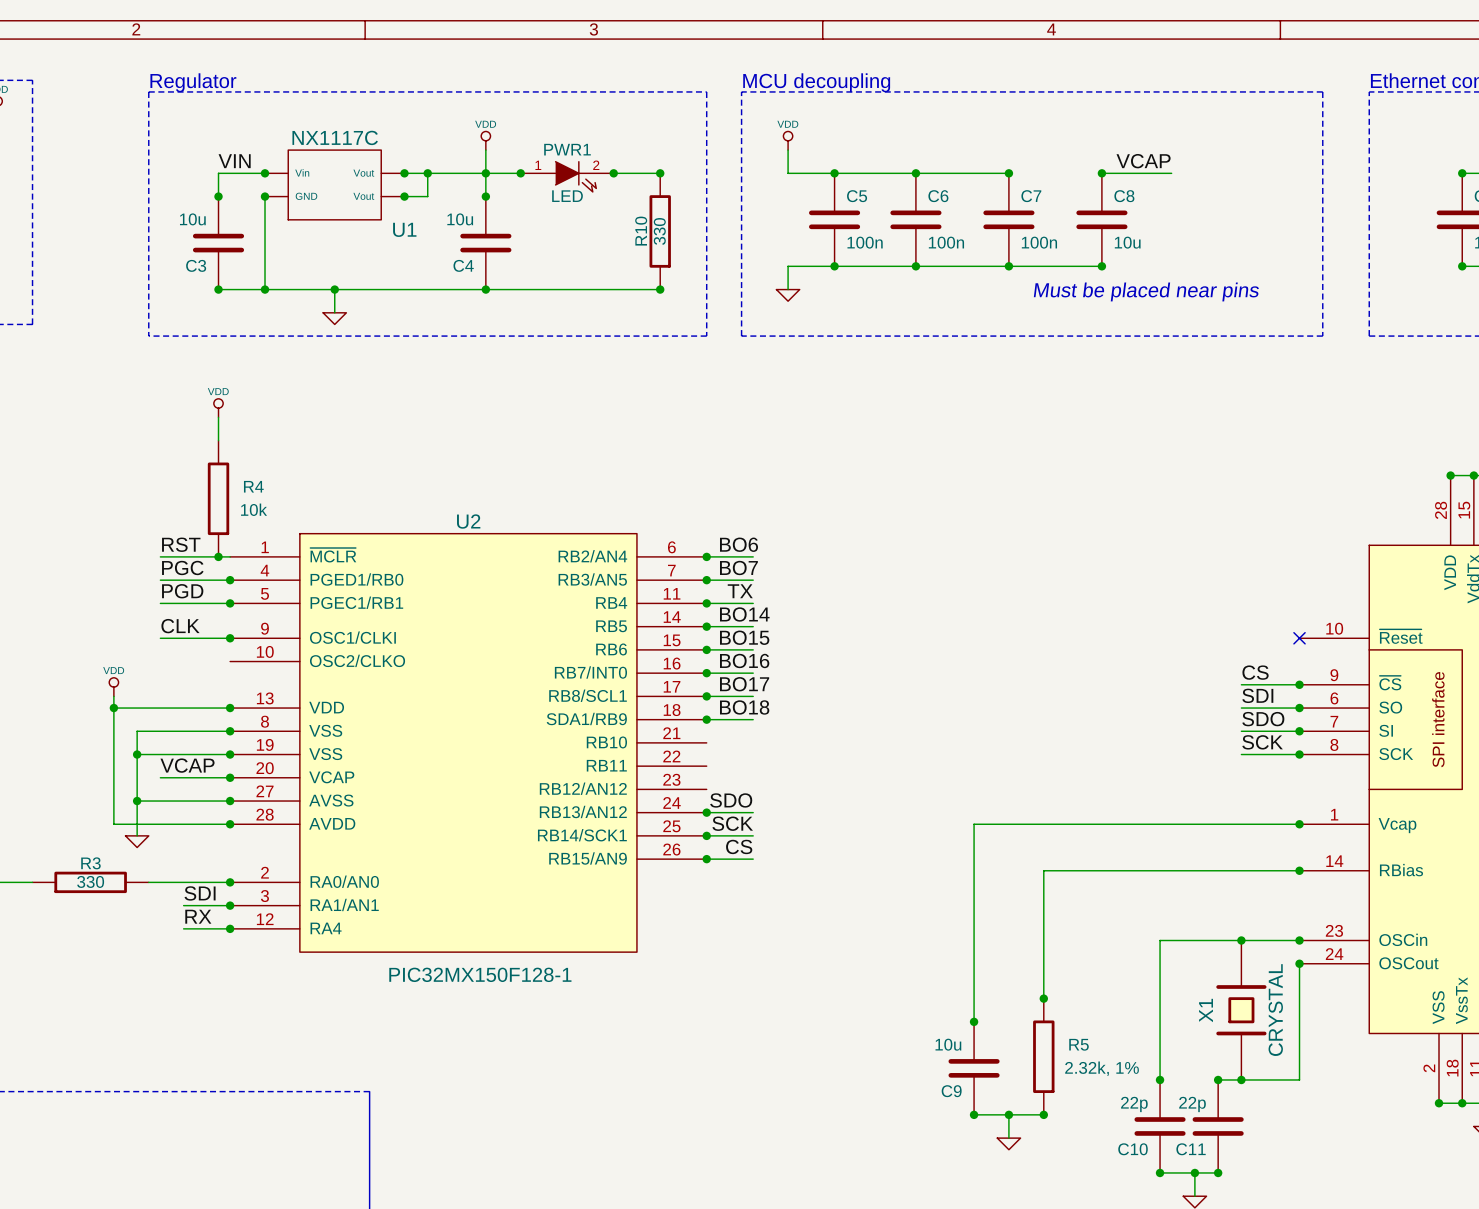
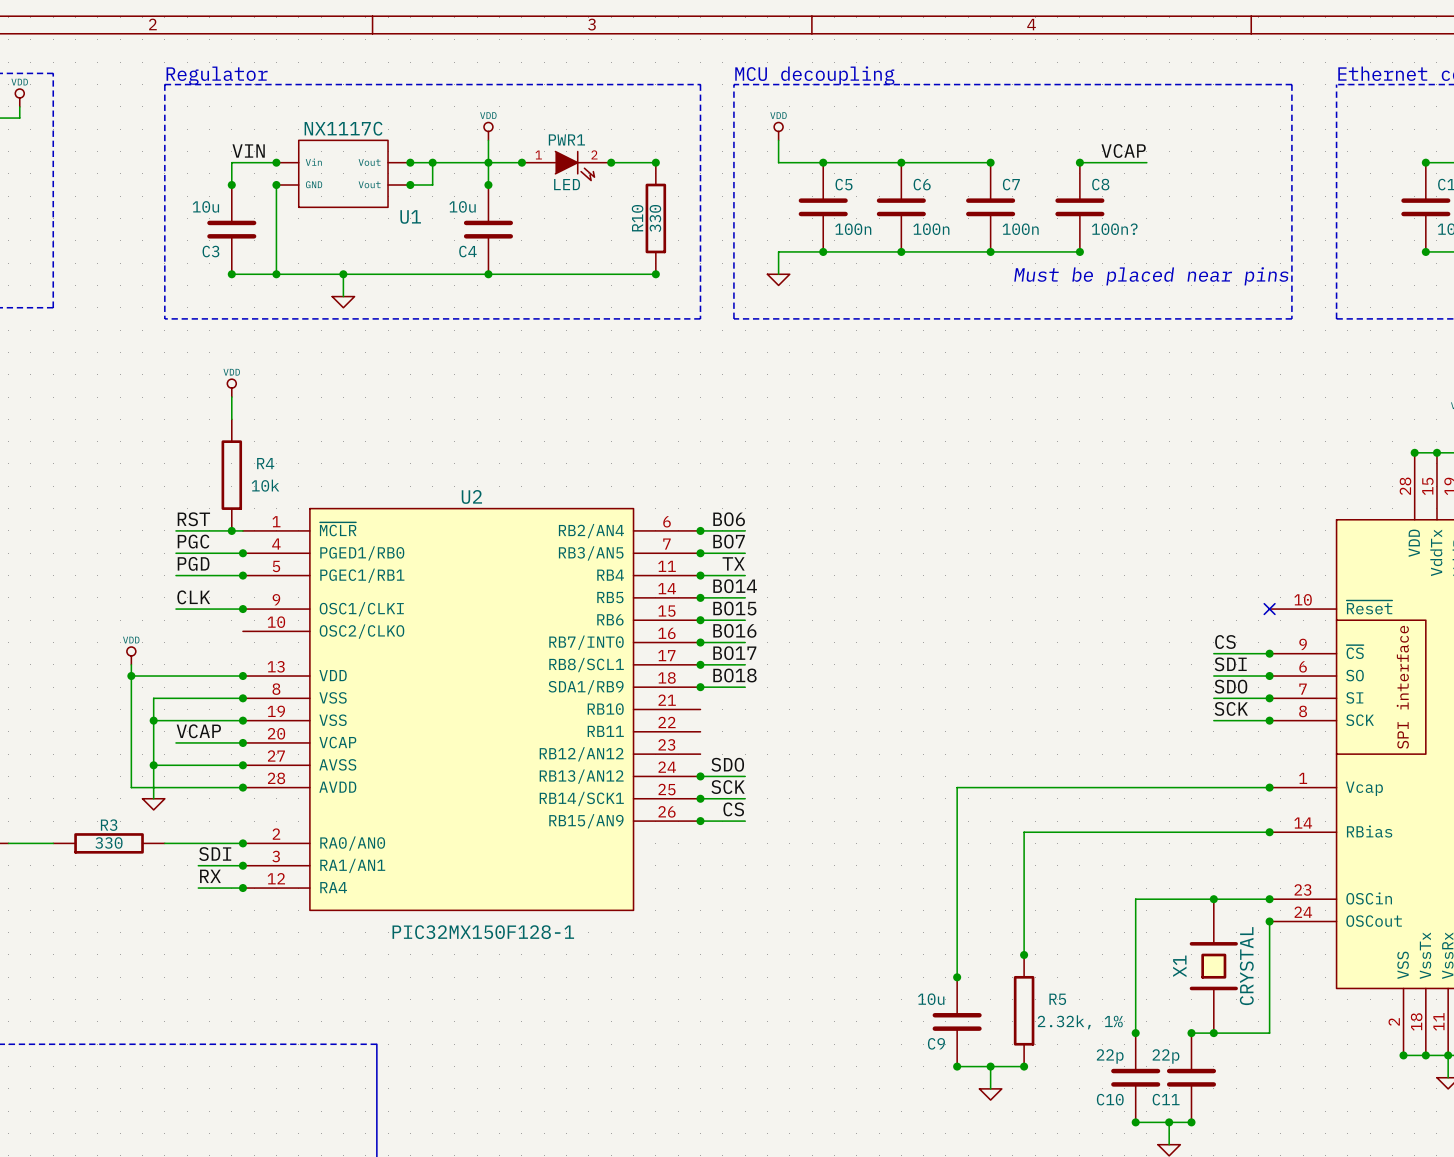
C8 value: 10u (1127, 242) -> 100n? (1114, 229)

